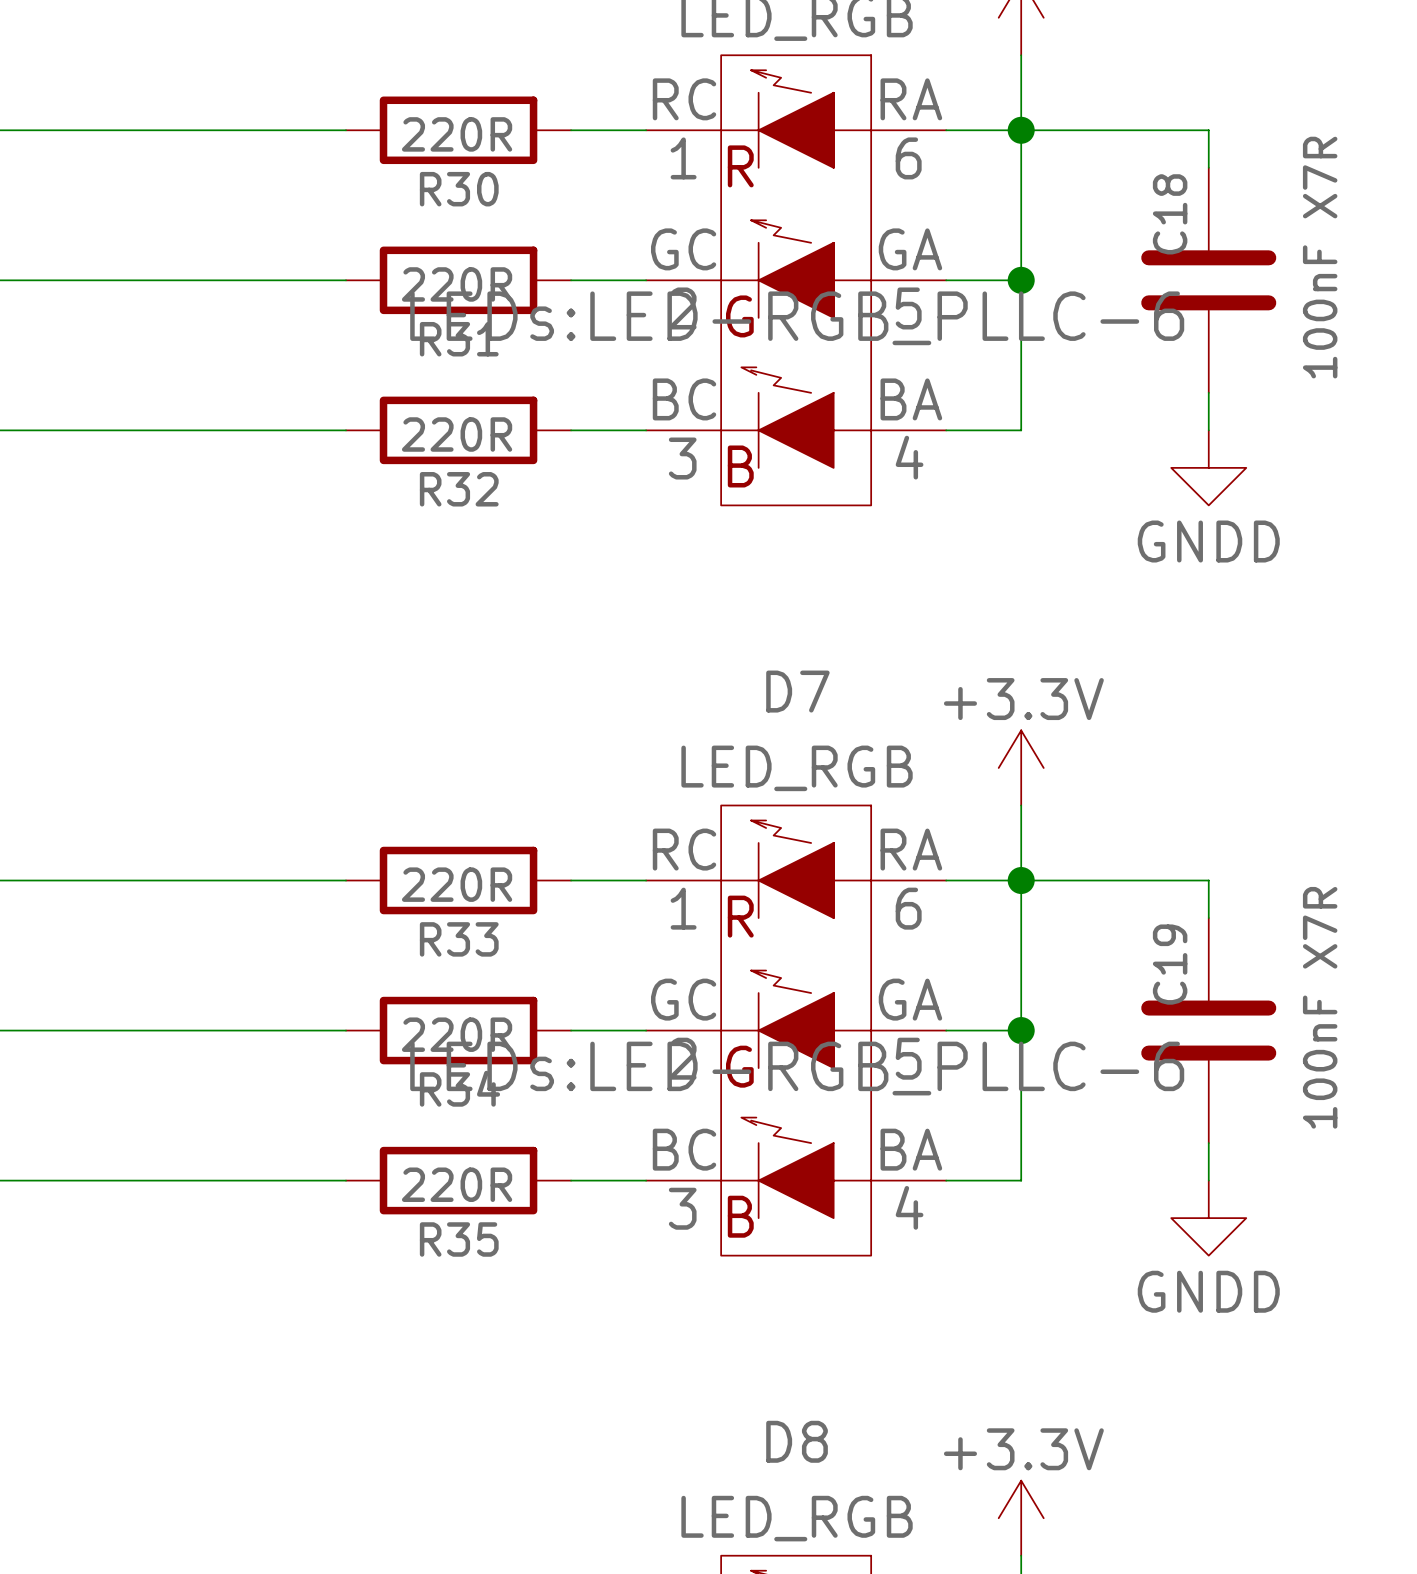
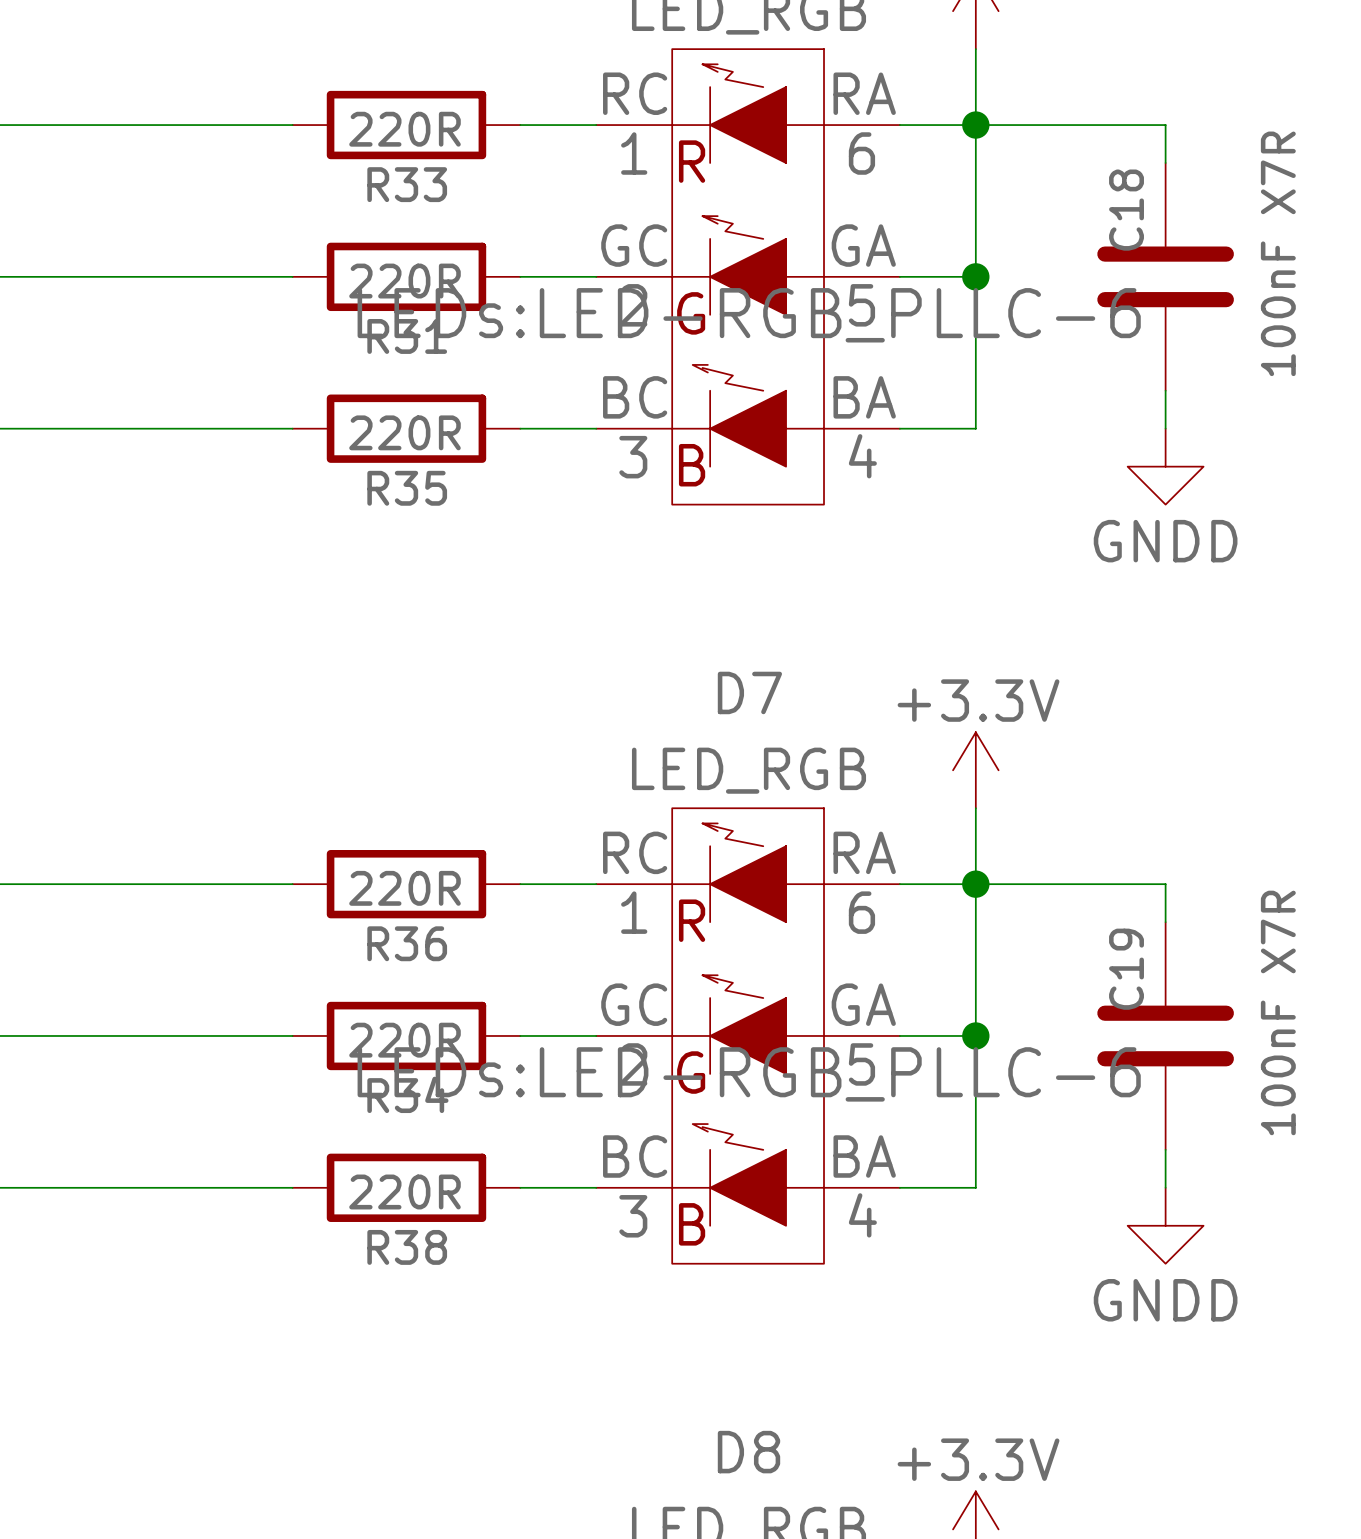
R30 name: R30 (459, 189) -> R33 (407, 184)
R32 name: R32 (459, 489) -> R35 (407, 488)
R33 name: R33 (459, 939) -> R36 (407, 943)
R35 name: R35 (459, 1239) -> R38 (407, 1247)

